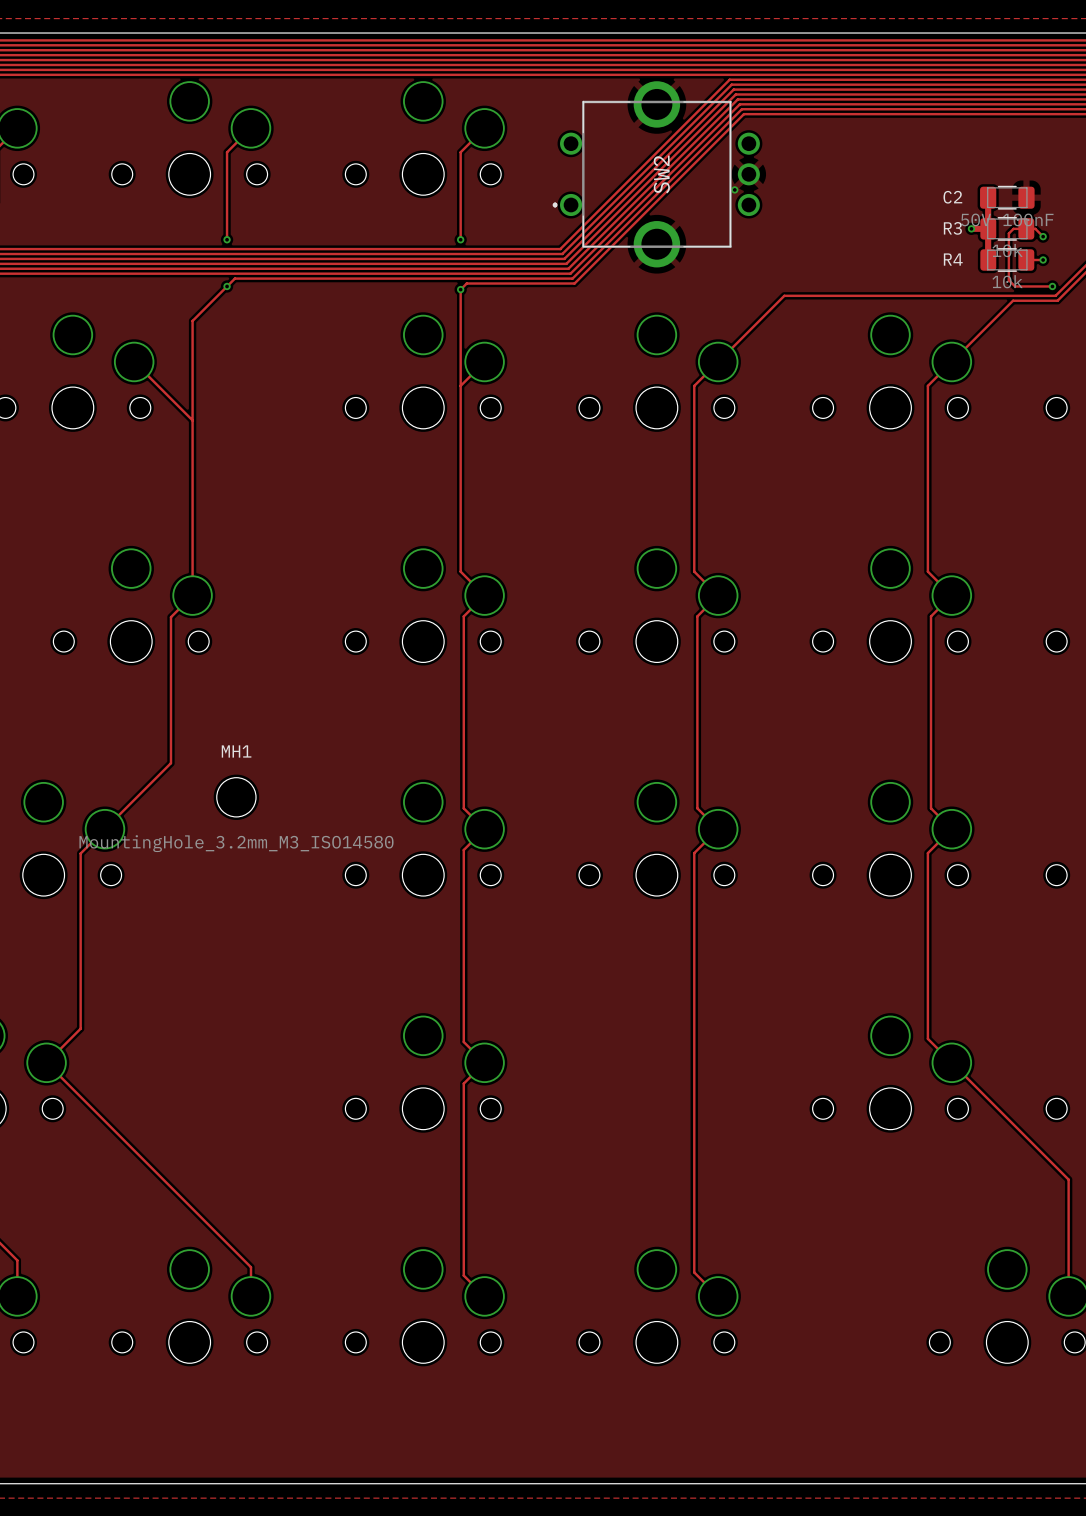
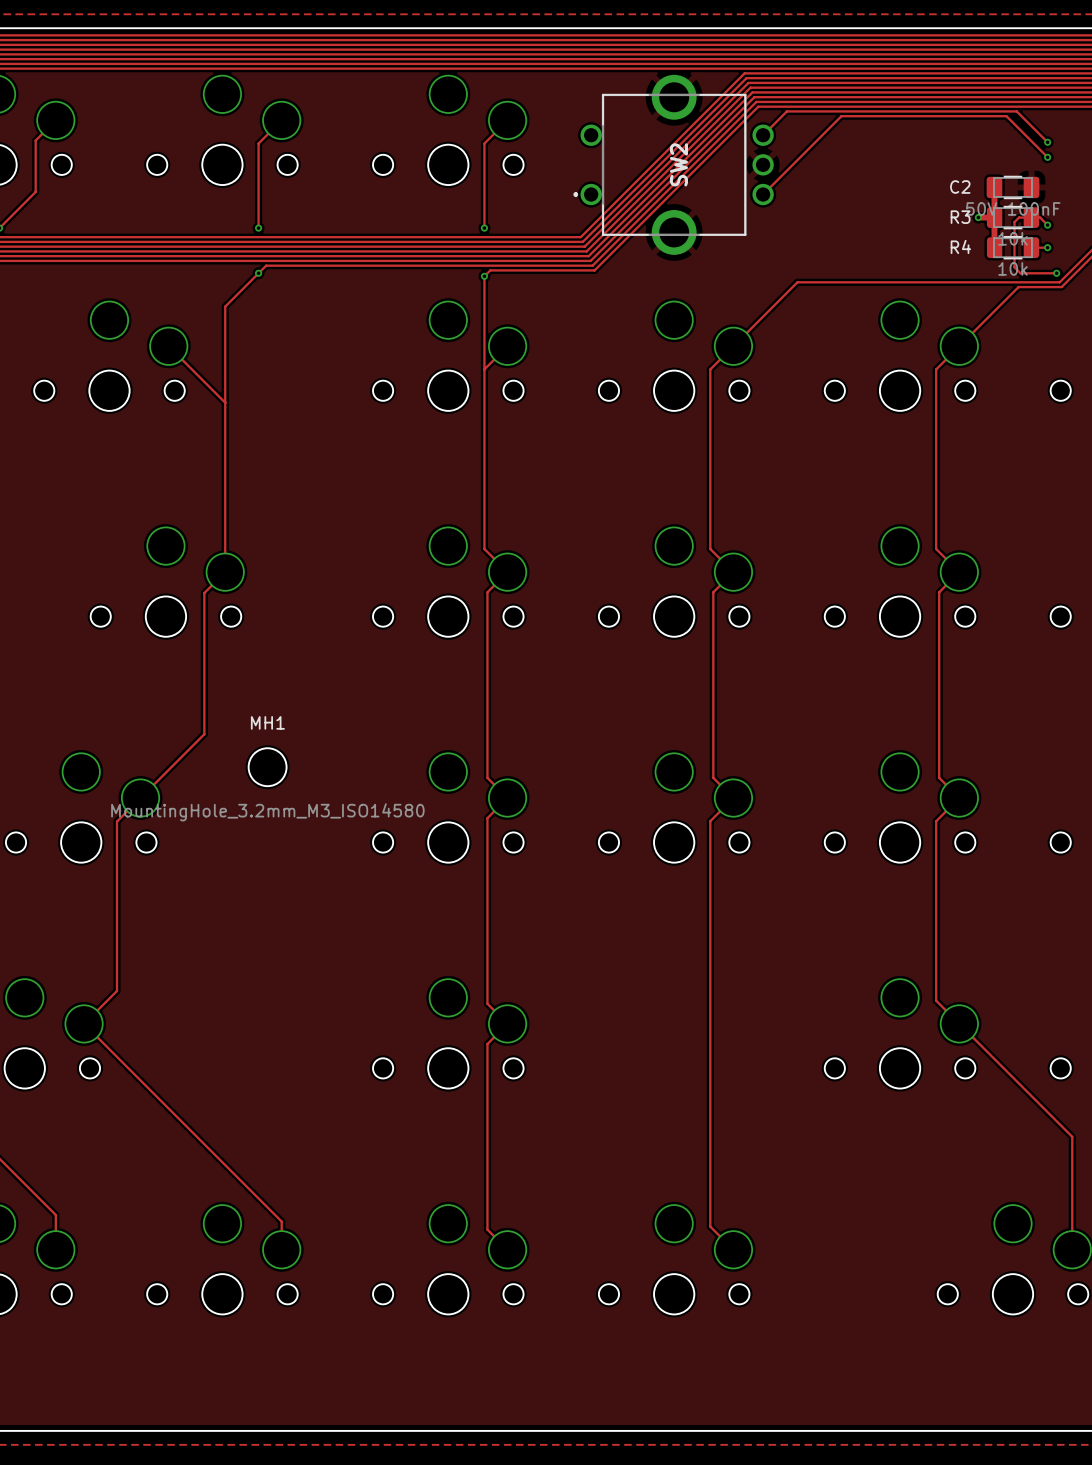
track: none -> (763, 135) (786, 111) (1016, 111) (1047, 142)
via: none -> (1047, 142)
track: none -> (1047, 157) (1006, 116) (841, 116) (763, 194)
via: none -> (1047, 157)
via: (734, 189) -> none

